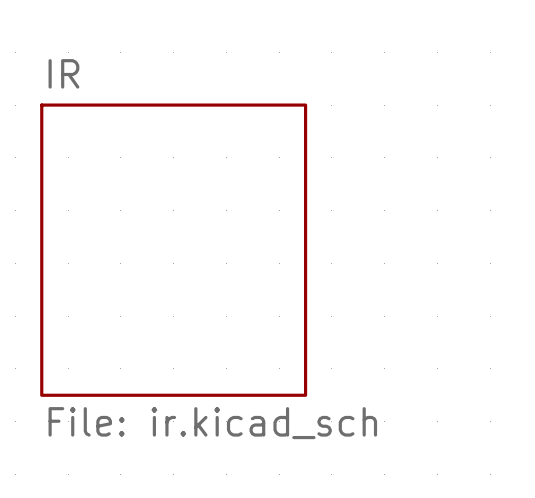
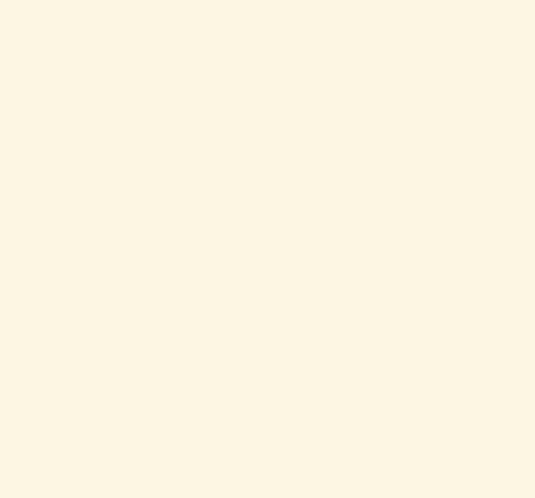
sheet IR: File: ir.kicad_sch (173, 250) -> none

